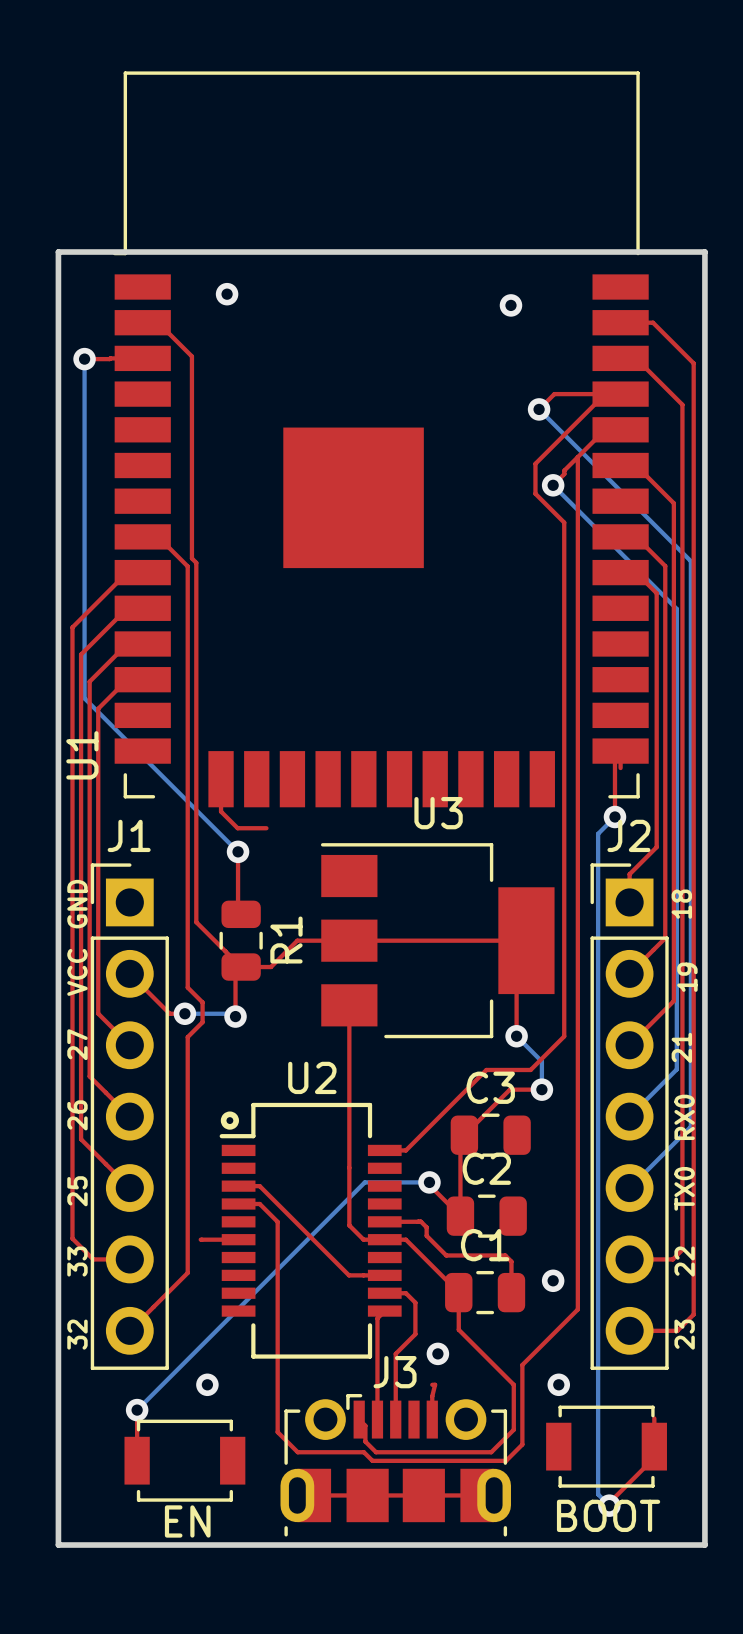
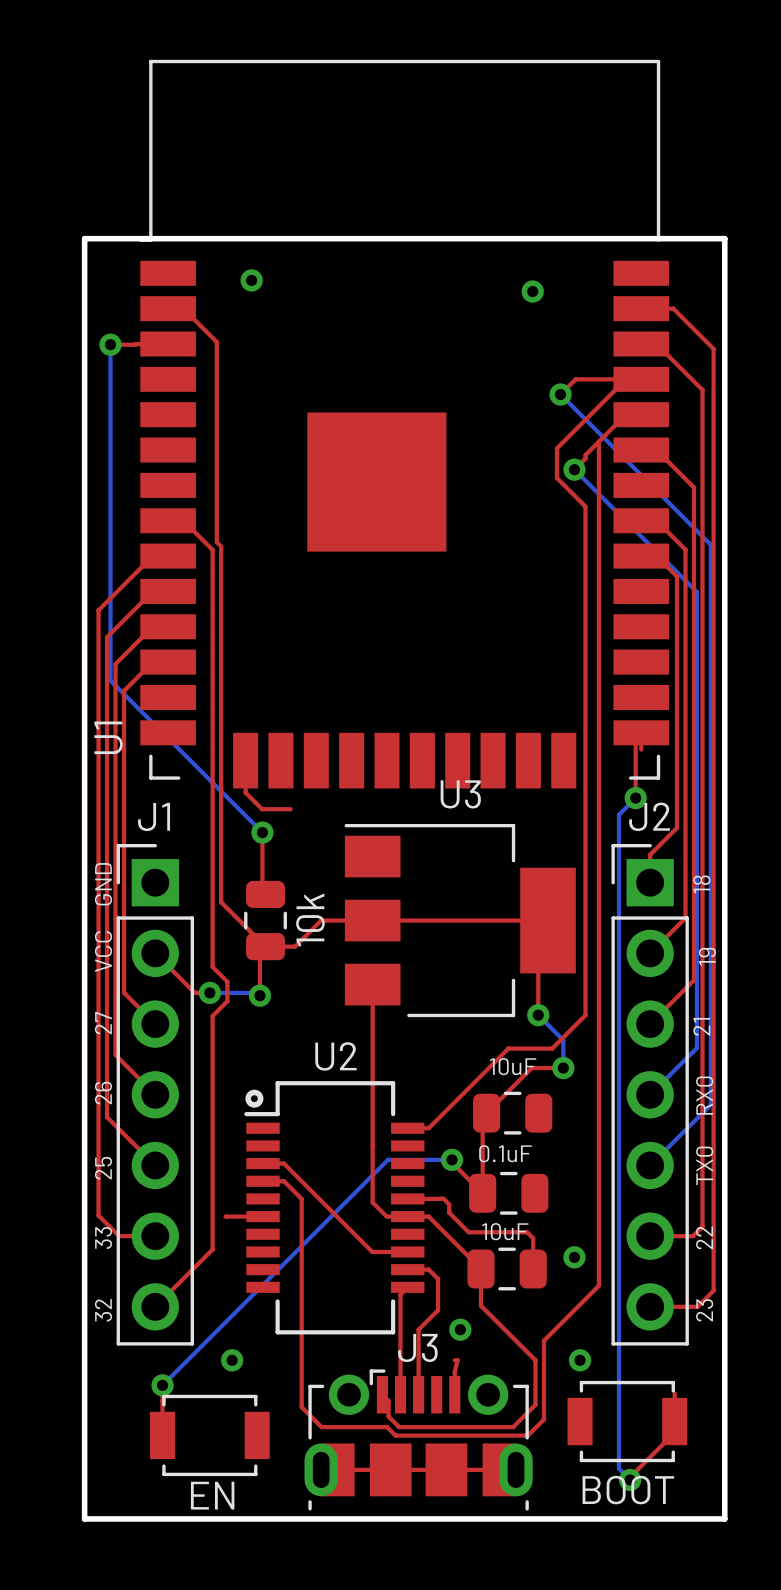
R1 name: R1 (286, 940) -> 10k (310, 919)
C3 name: C3 (490, 1087) -> 10uF (513, 1066)
C2 name: C2 (486, 1168) -> 0.1uF (505, 1153)
C1 name: C1 (485, 1245) -> 10uF (505, 1231)

